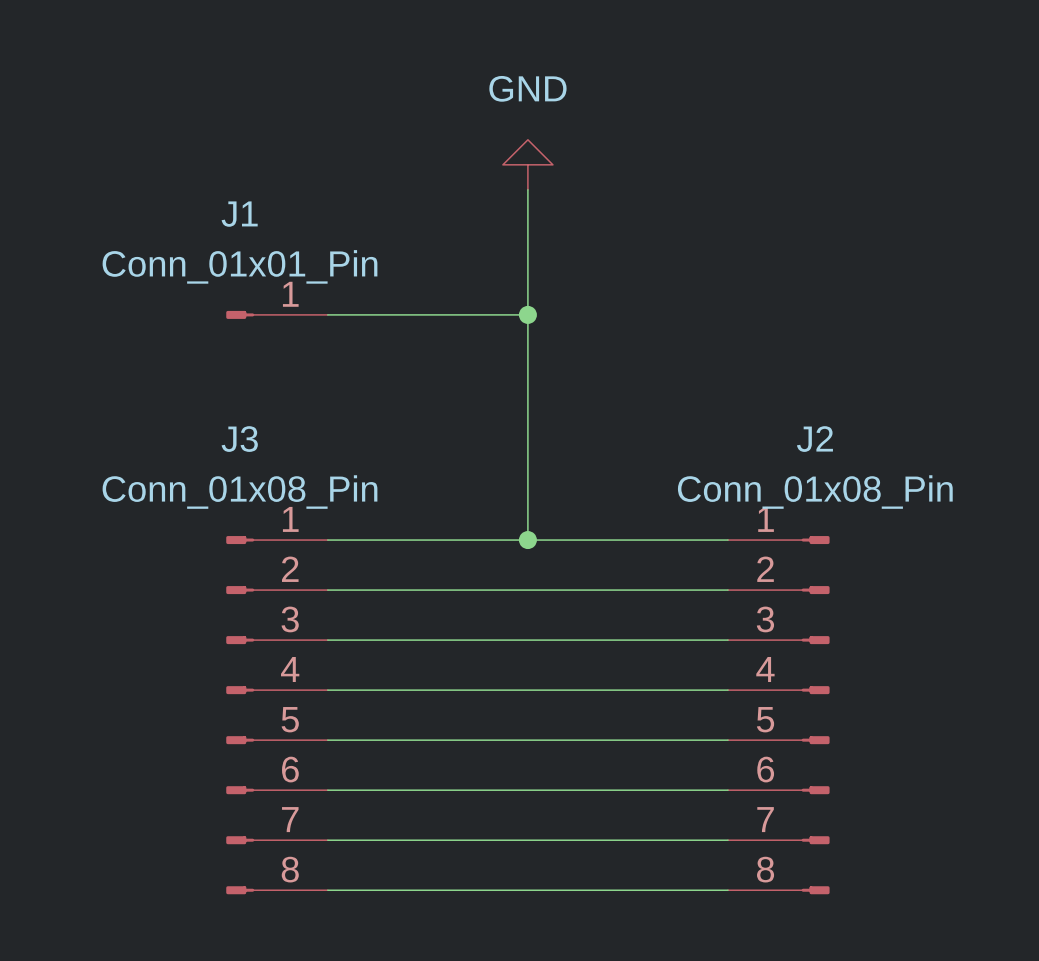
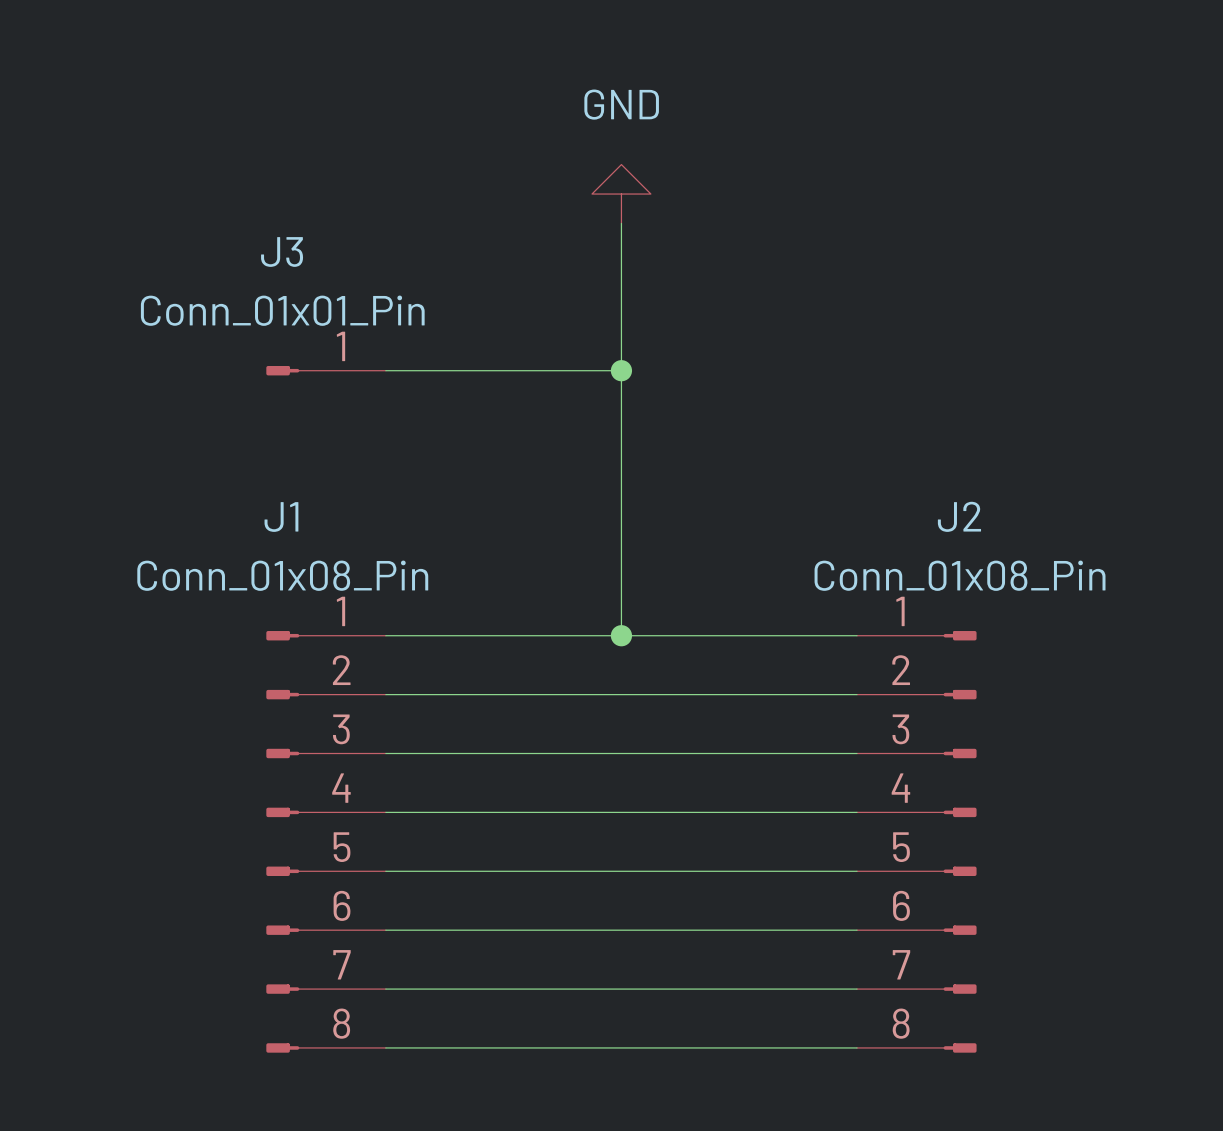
J1 name: J1 (239, 214) -> J3 (282, 251)
J3 name: J3 (239, 439) -> J1 (281, 517)

